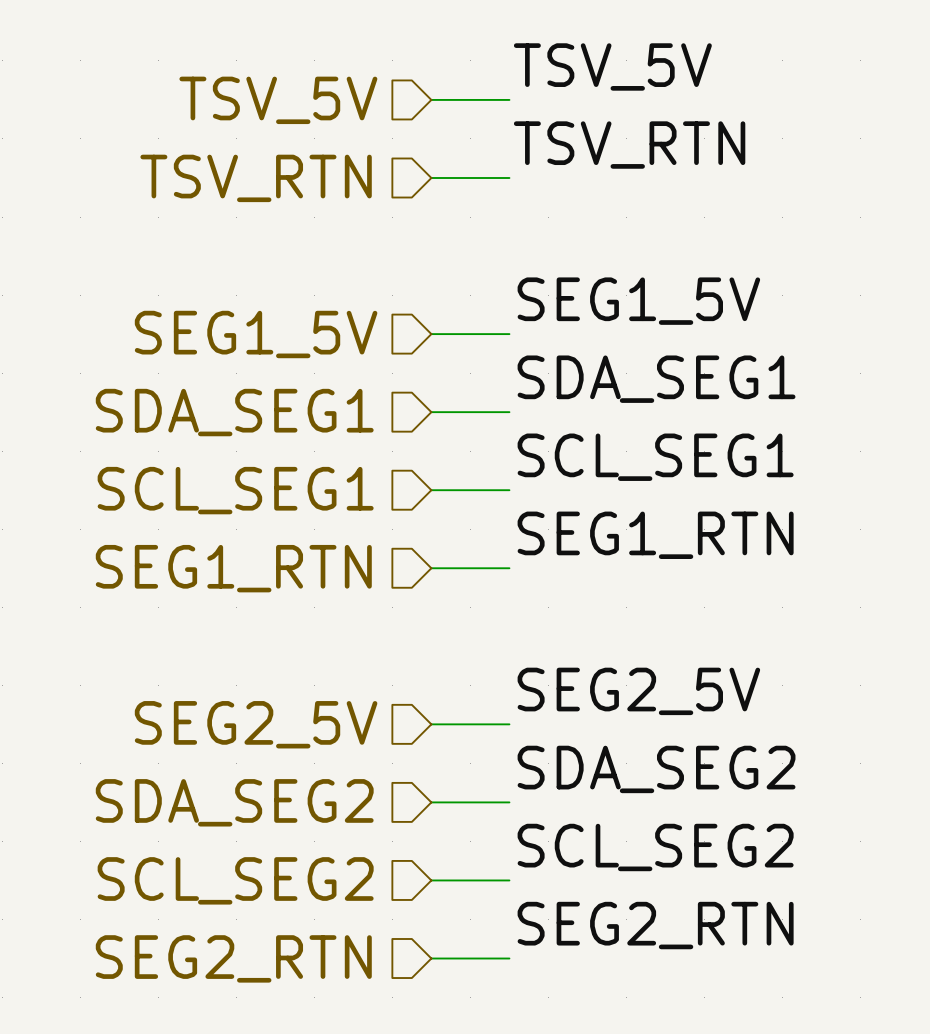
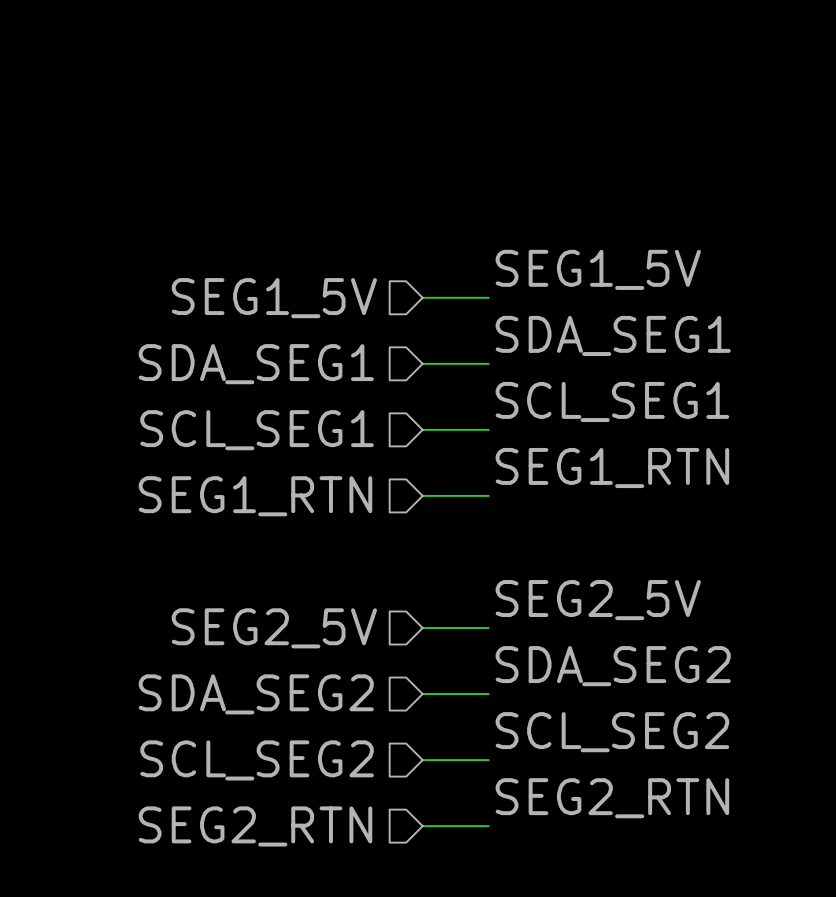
label: TSV_5V (612, 66) -> none
wire: (431, 99) (509, 99) -> none
hierarchical label: TSV_5V (278, 100) -> none
label: TSV_RTN (629, 145) -> none
hierarchical label: TSV_RTN (256, 178) -> none
wire: (431, 178) (509, 178) -> none

